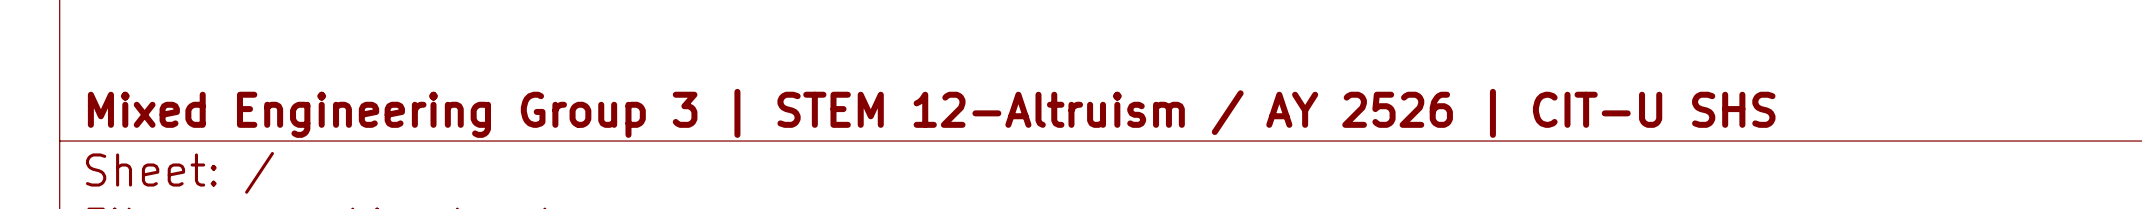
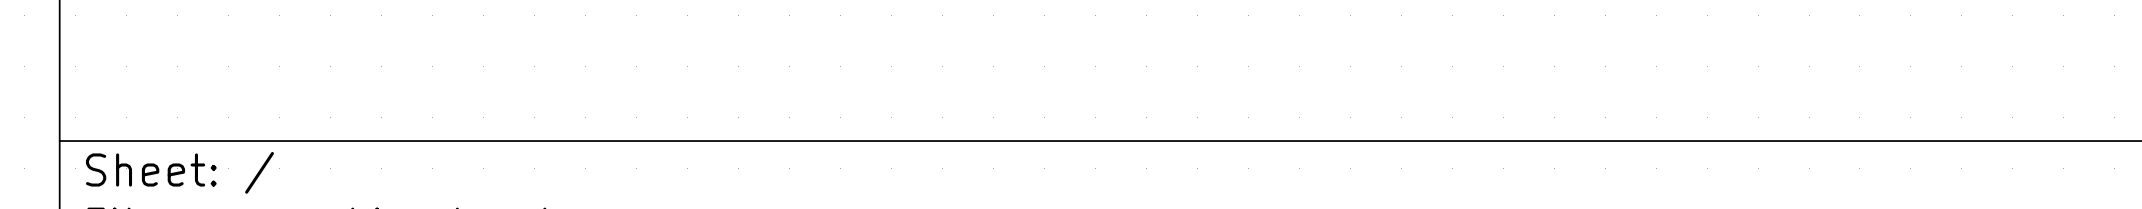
title block: Mixed Engineering Group 3 | STEM 12-Altruism / AY 2526 | CIT-U SHS (931, 113) -> none

